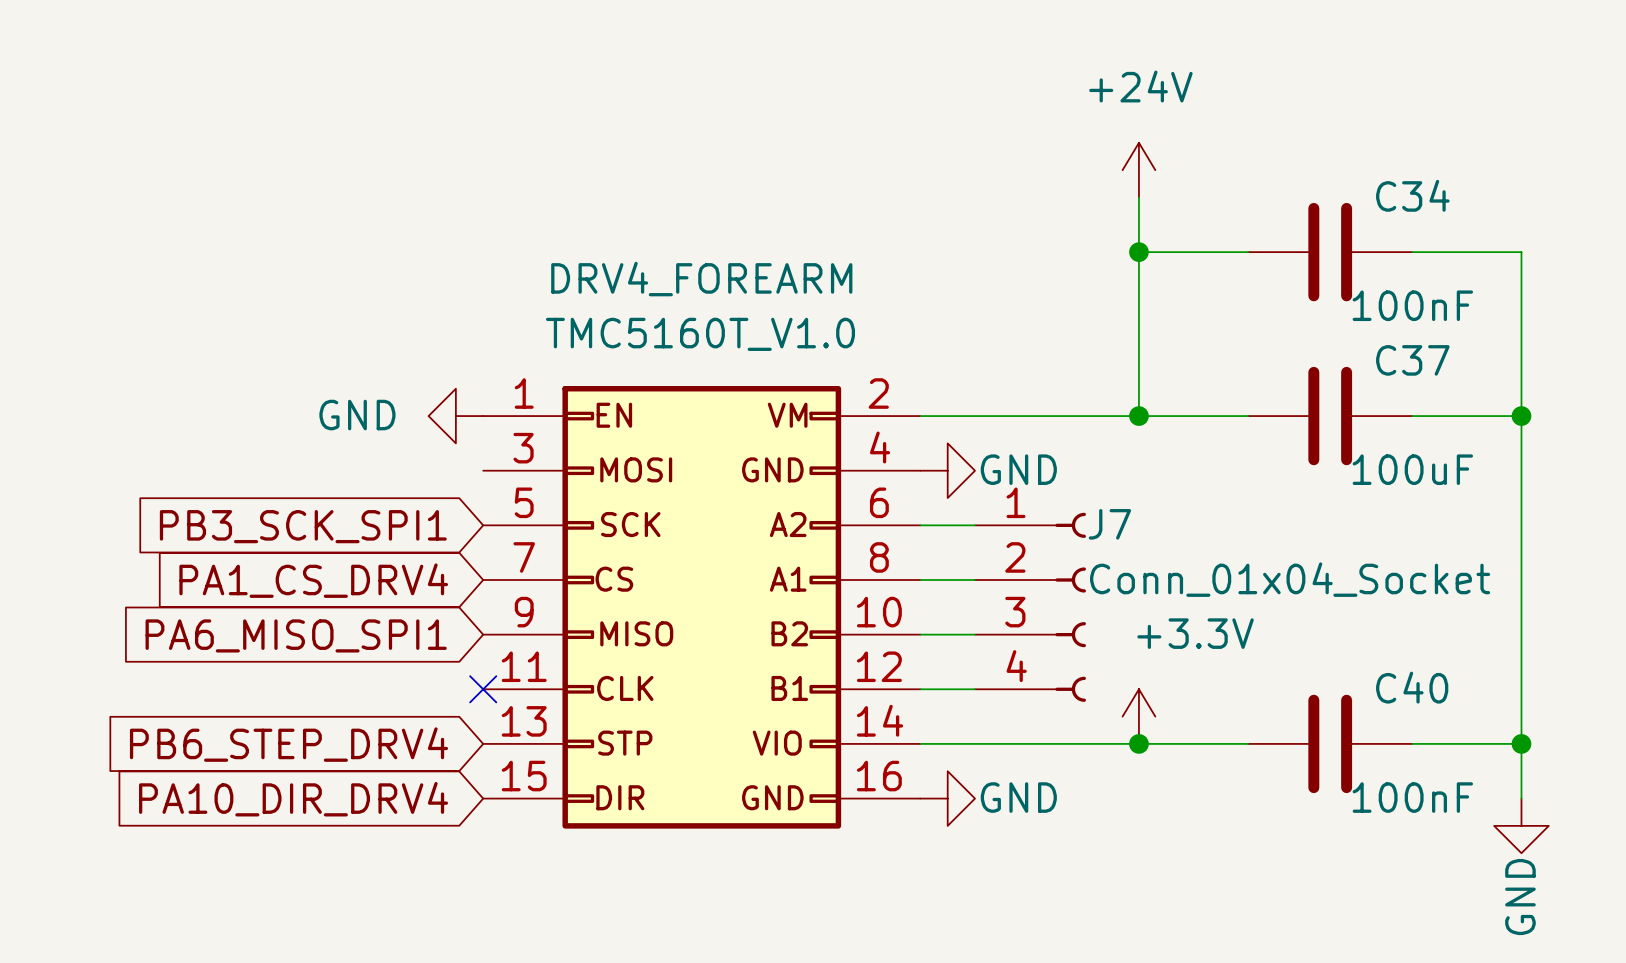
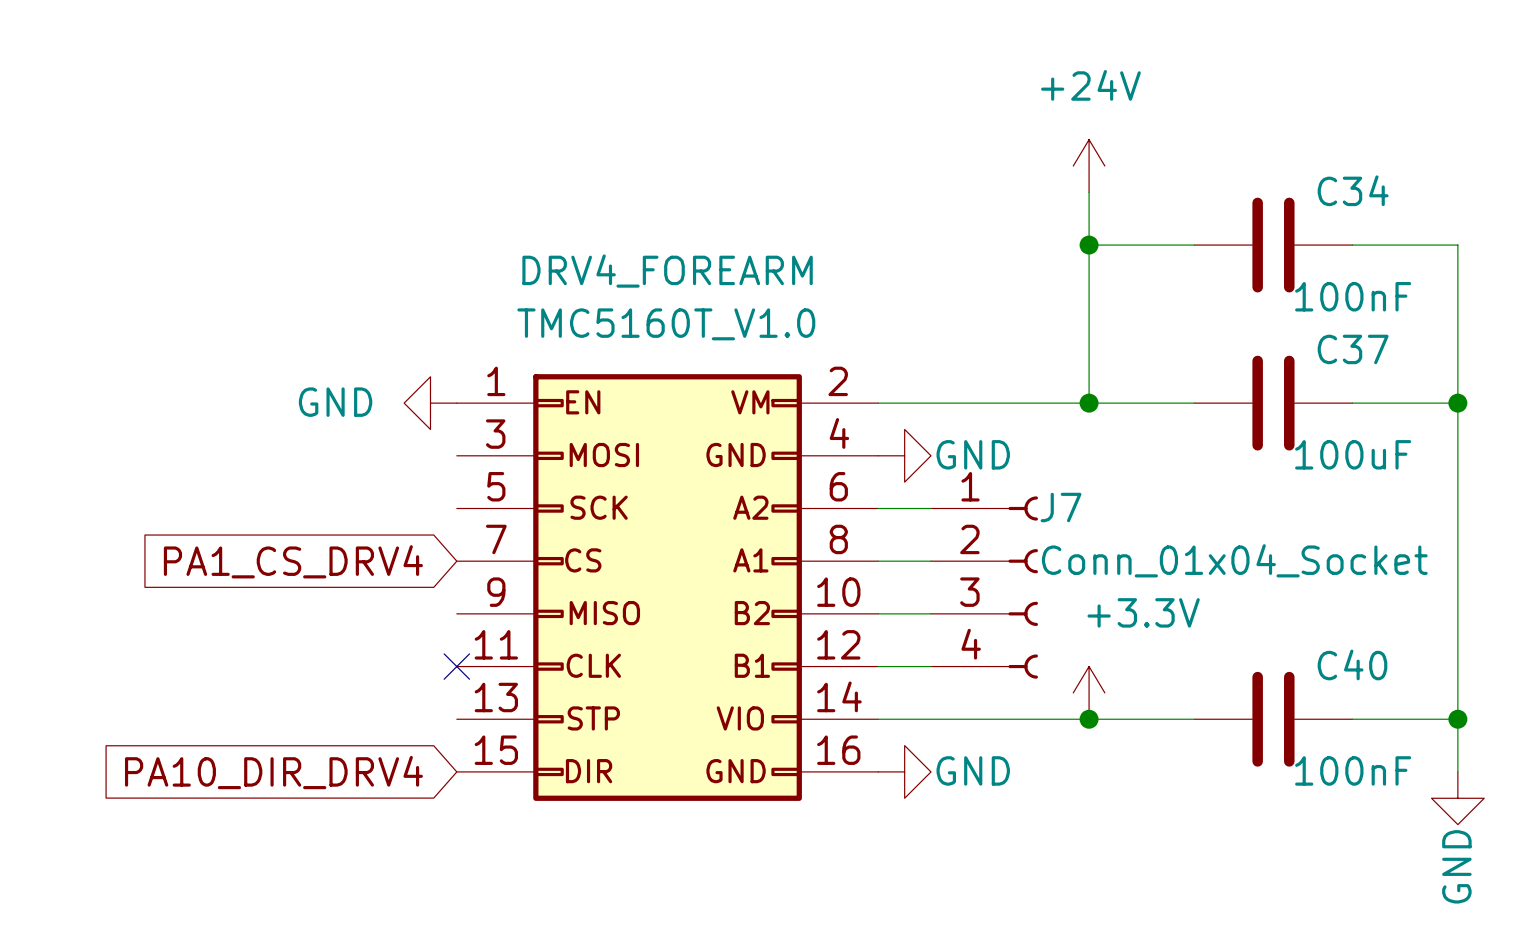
global label: PB3_SCK_SPI1 (303, 526) -> none
global label: PA6_MISO_SPI1 (296, 635) -> none
global label: PB6_STEP_DRV4 (288, 744) -> none

